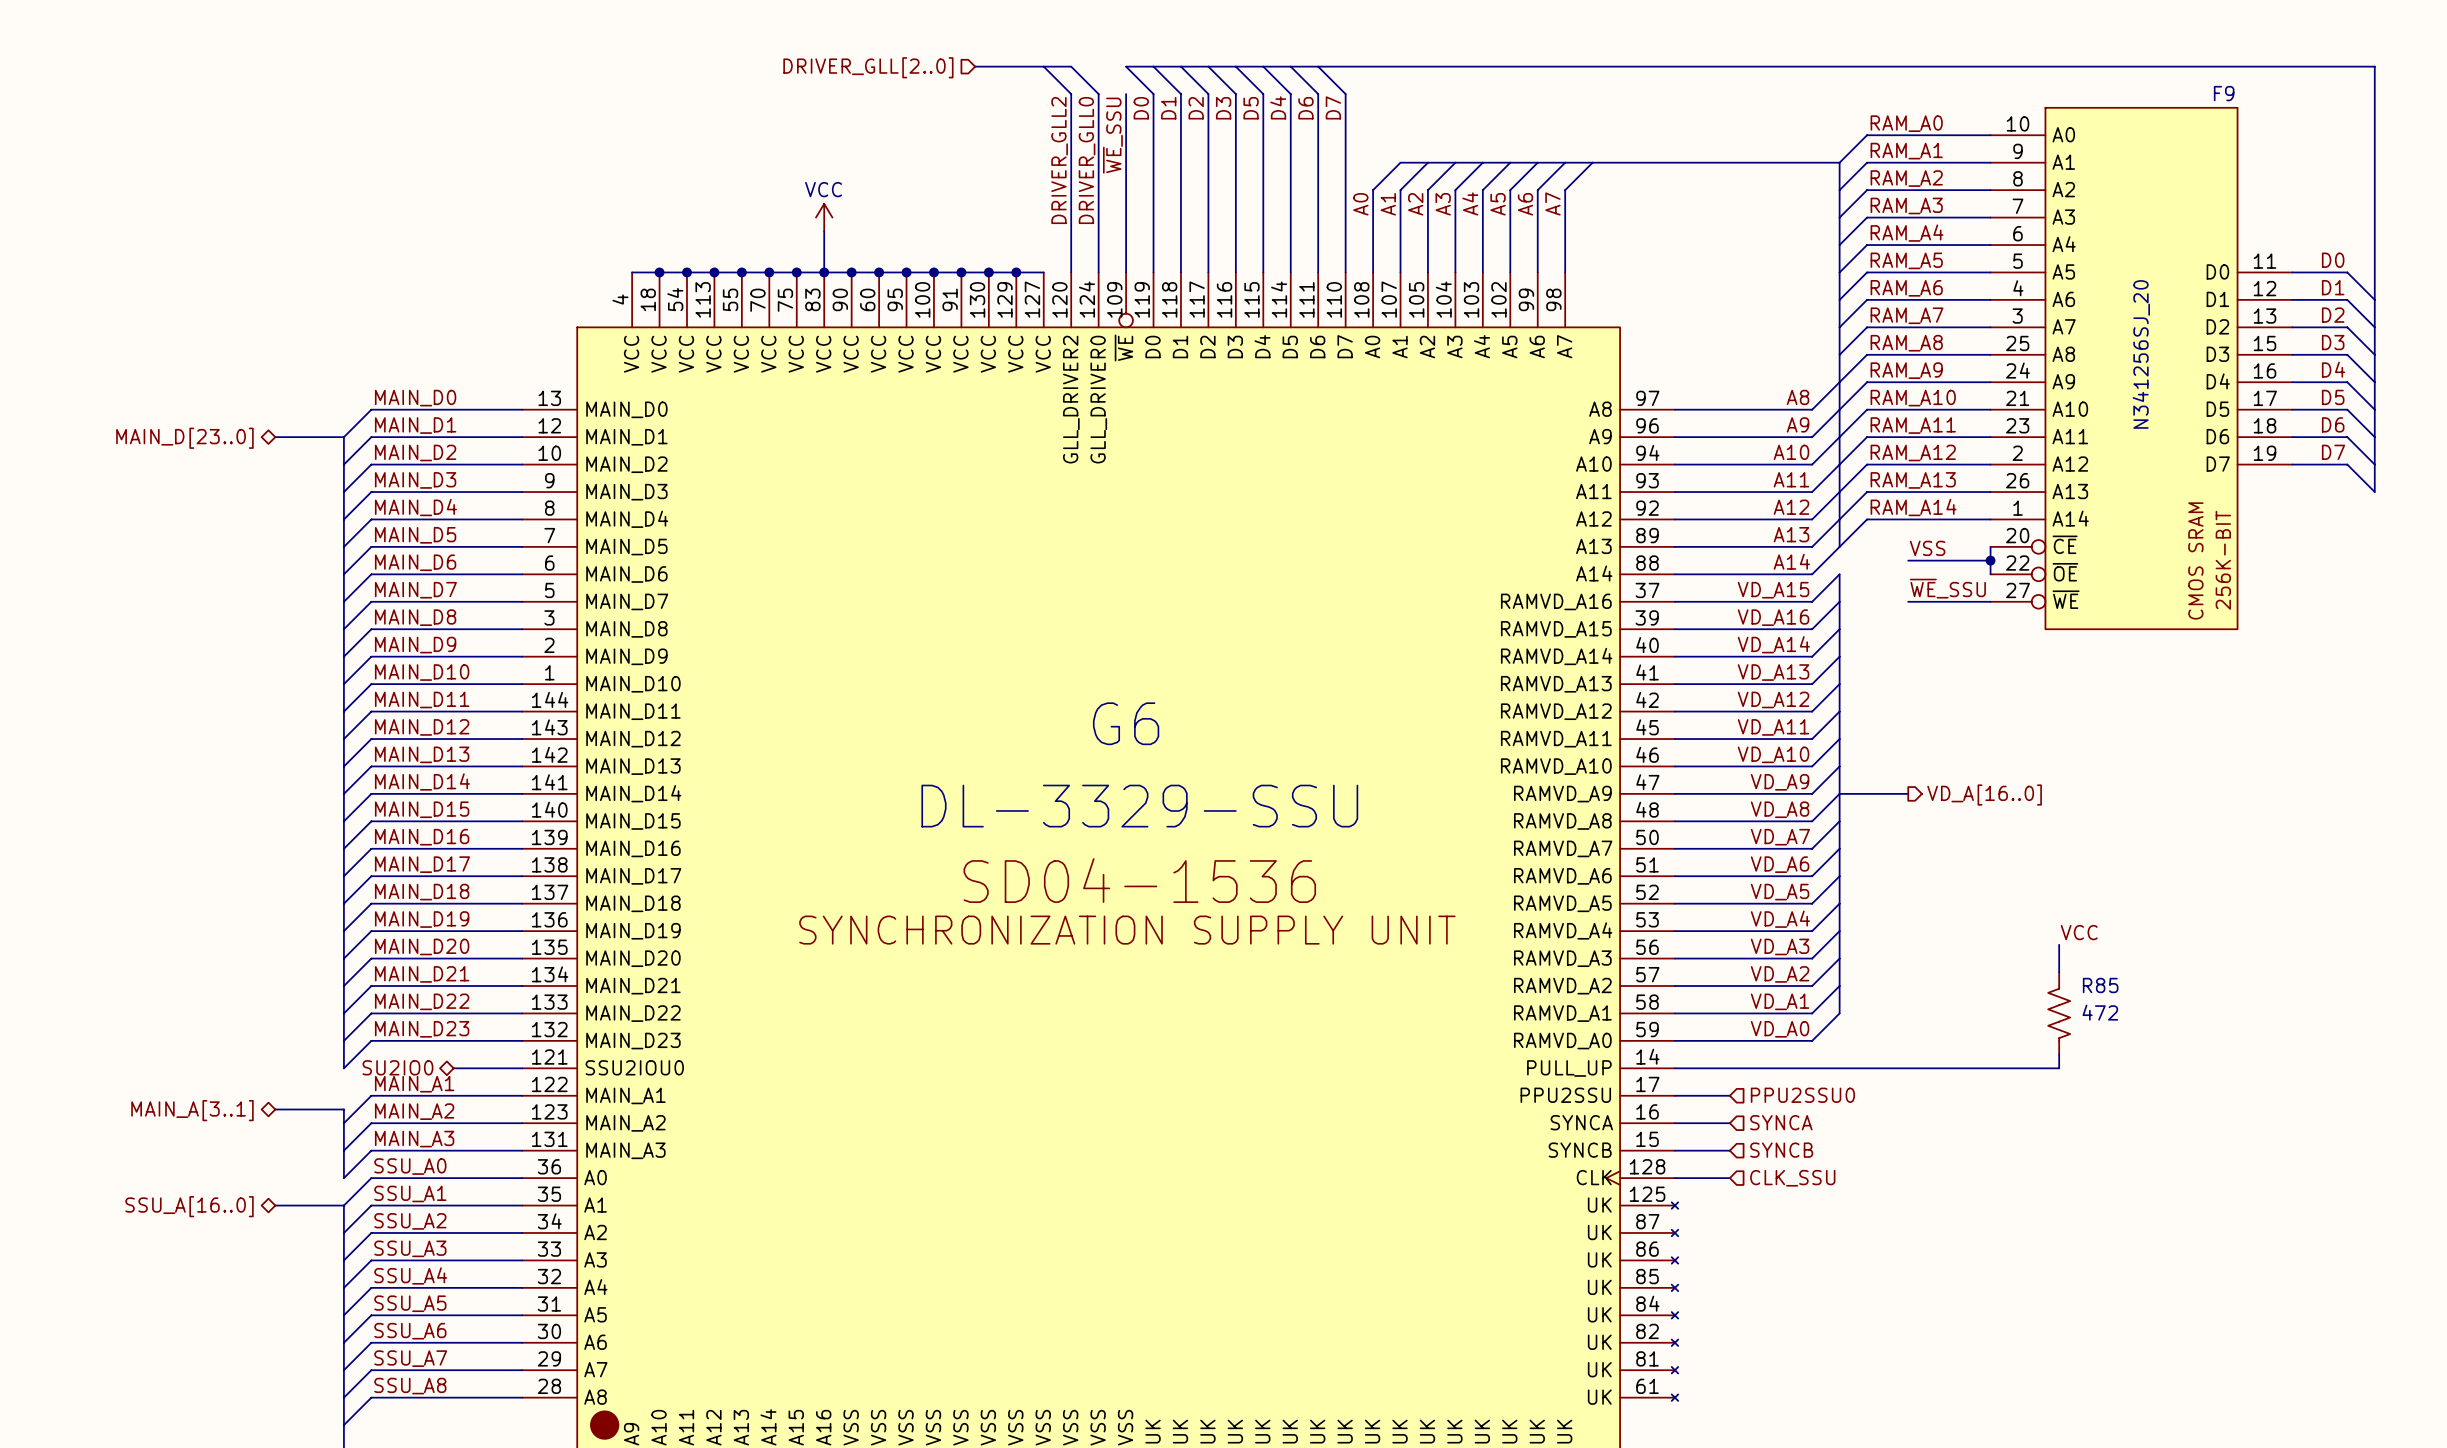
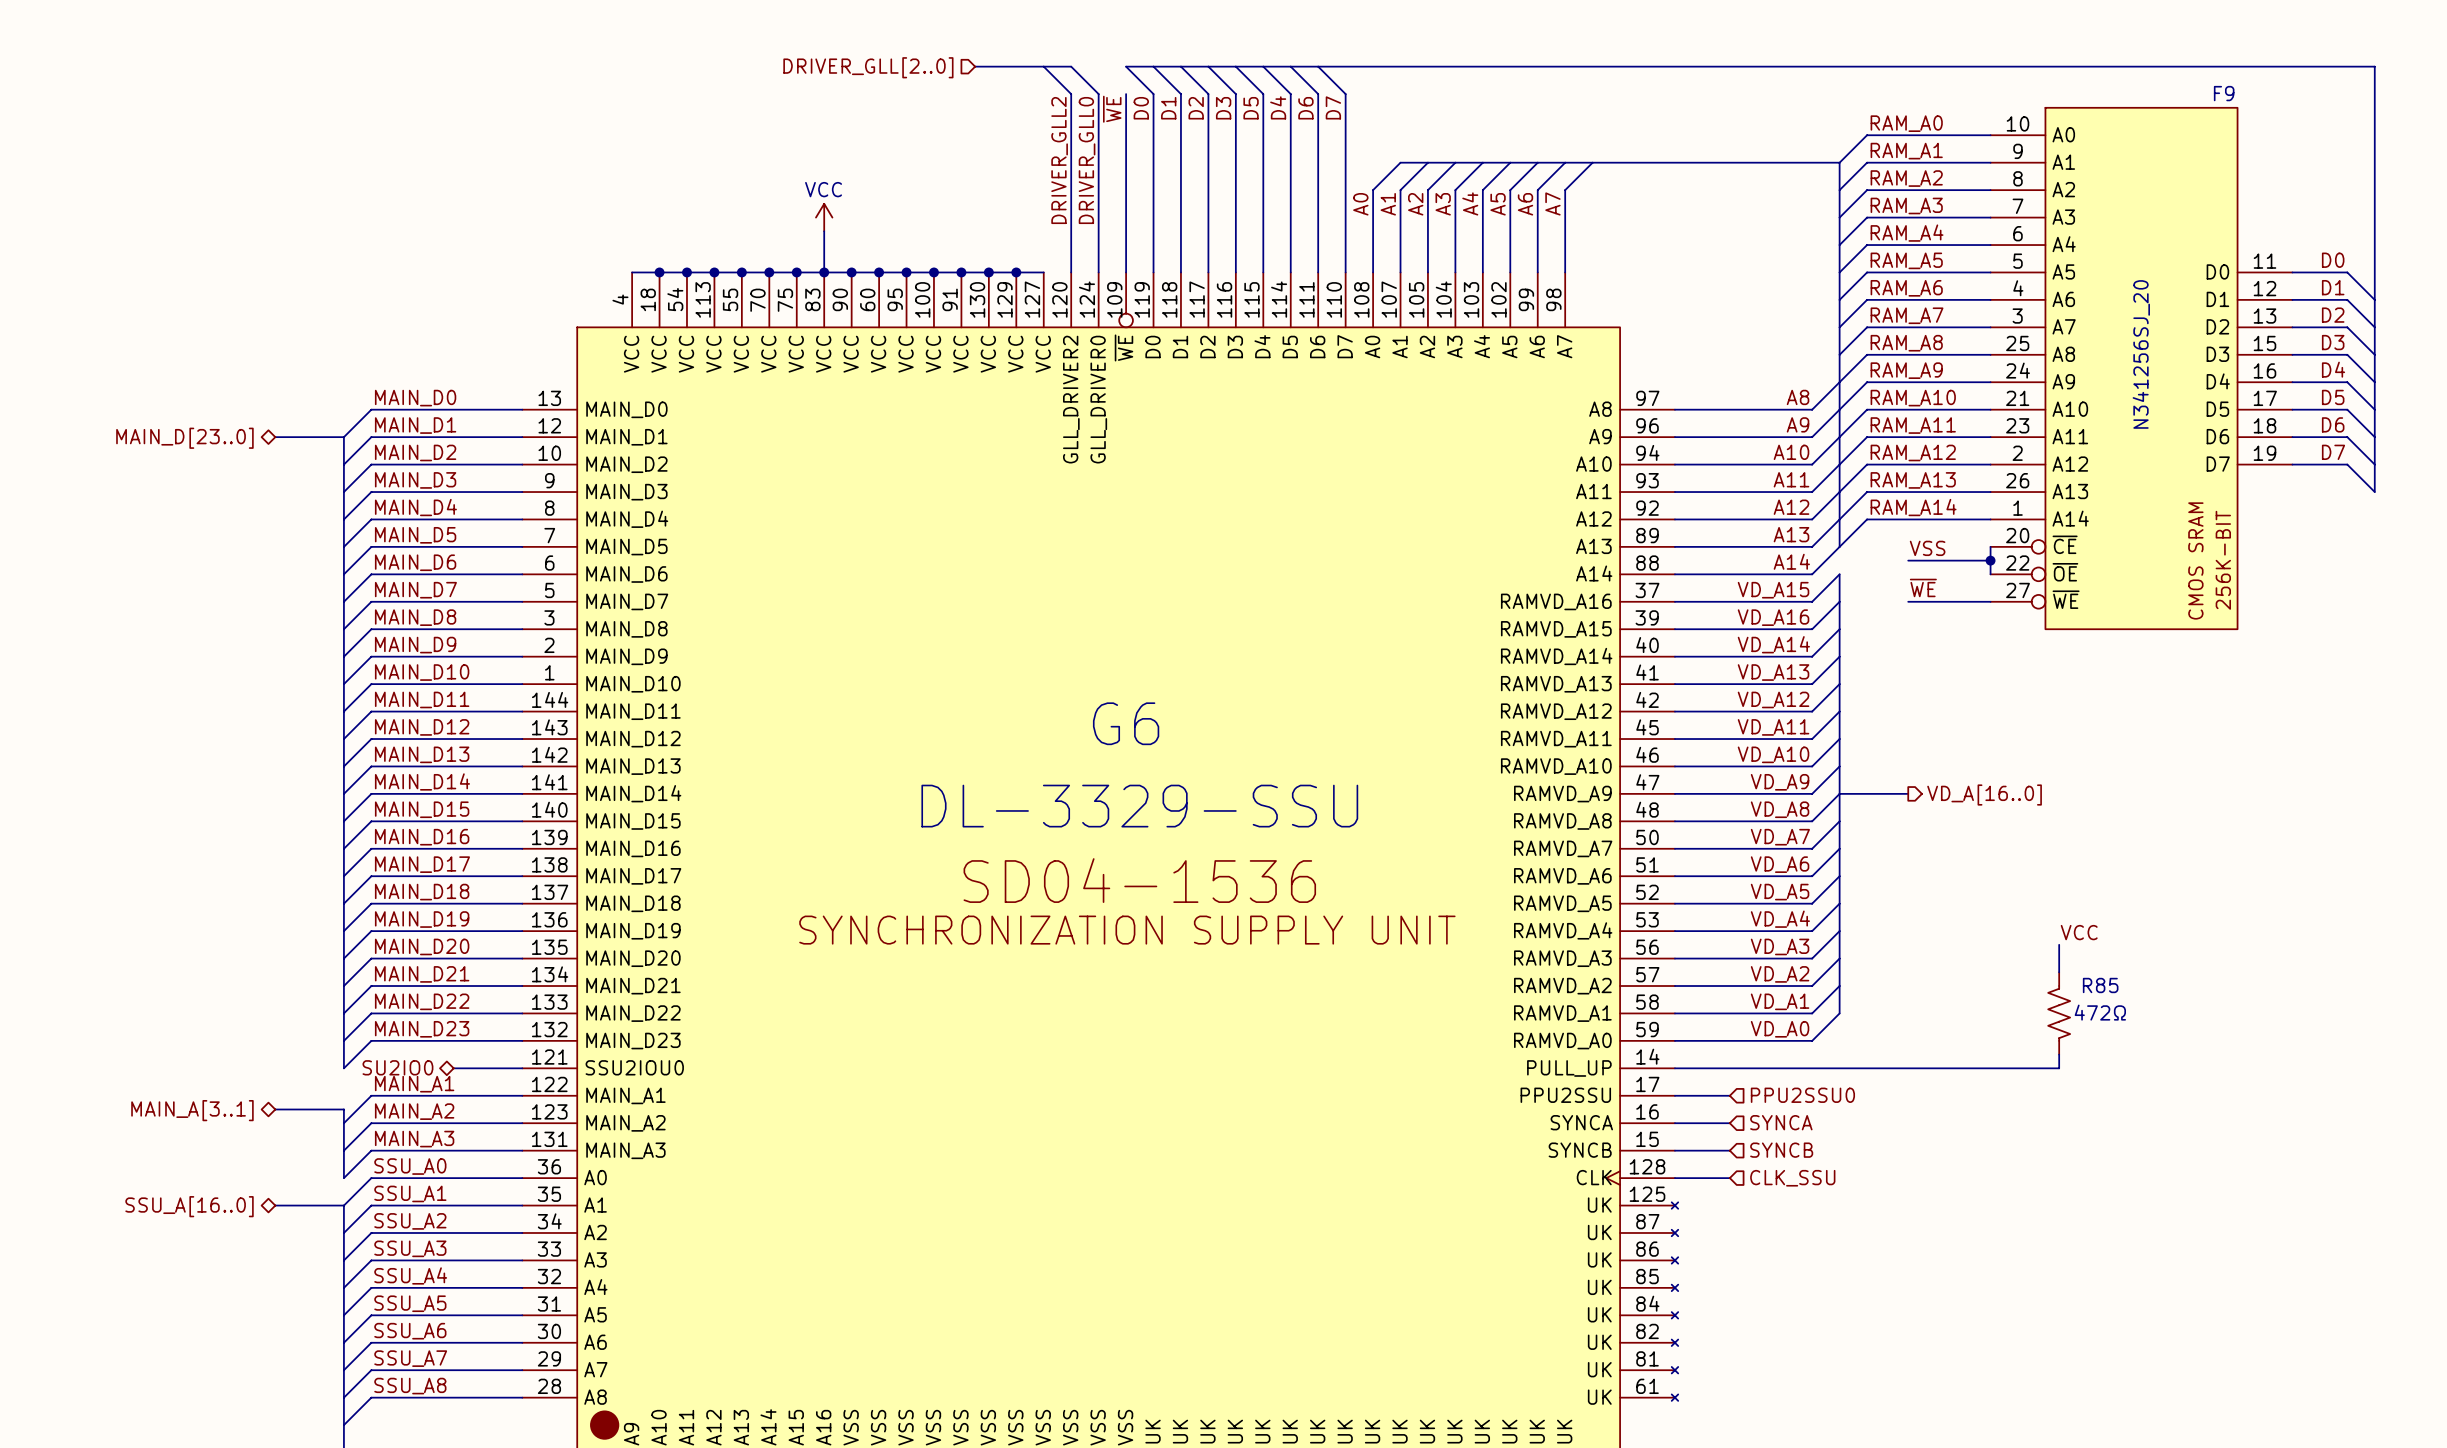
label: ~{WE}_SSU (1112, 135) -> ~{WE} (1112, 109)
label: ~{WE}_SSU (1947, 588) -> ~{WE} (1923, 587)
R85 value: 472 (2100, 1012) -> 472Ω (2100, 1012)

